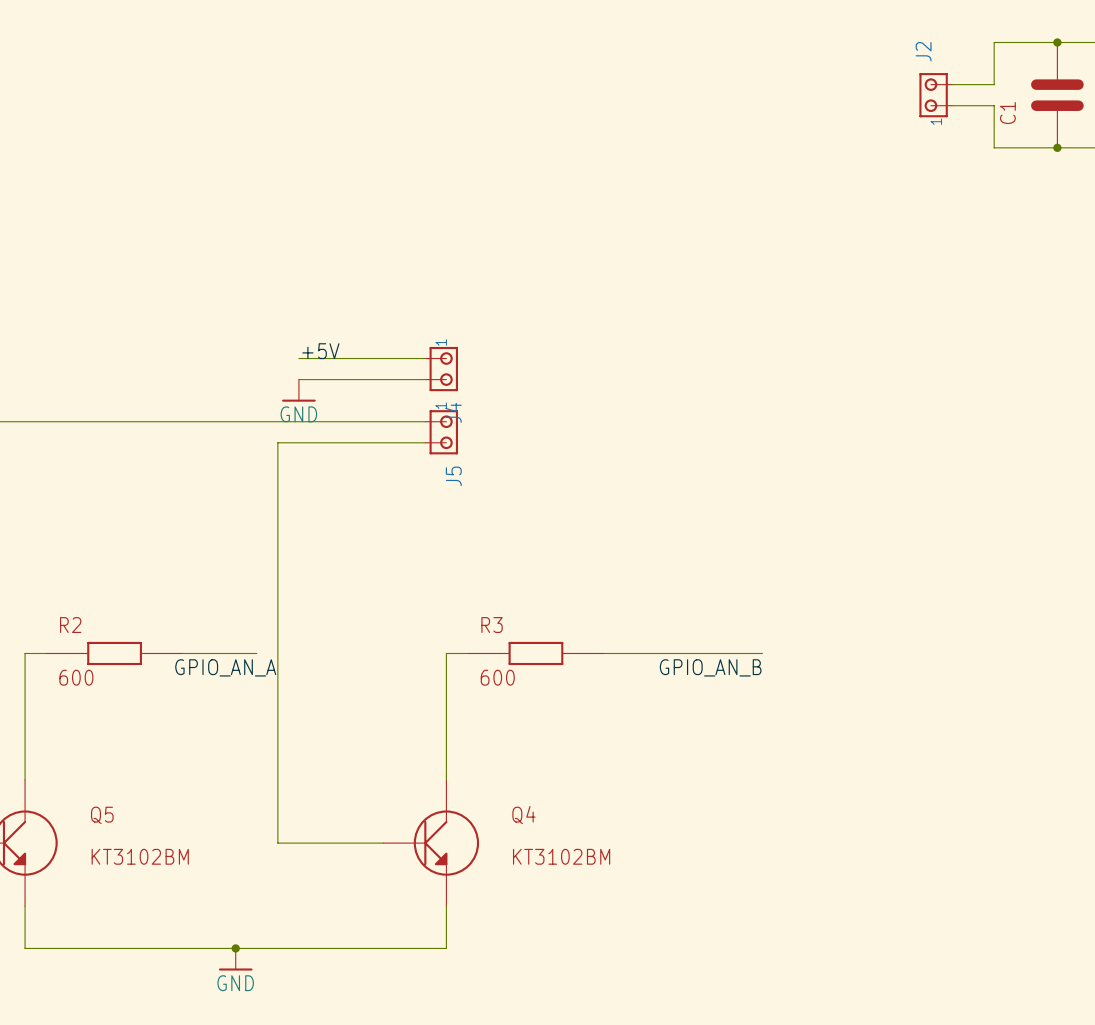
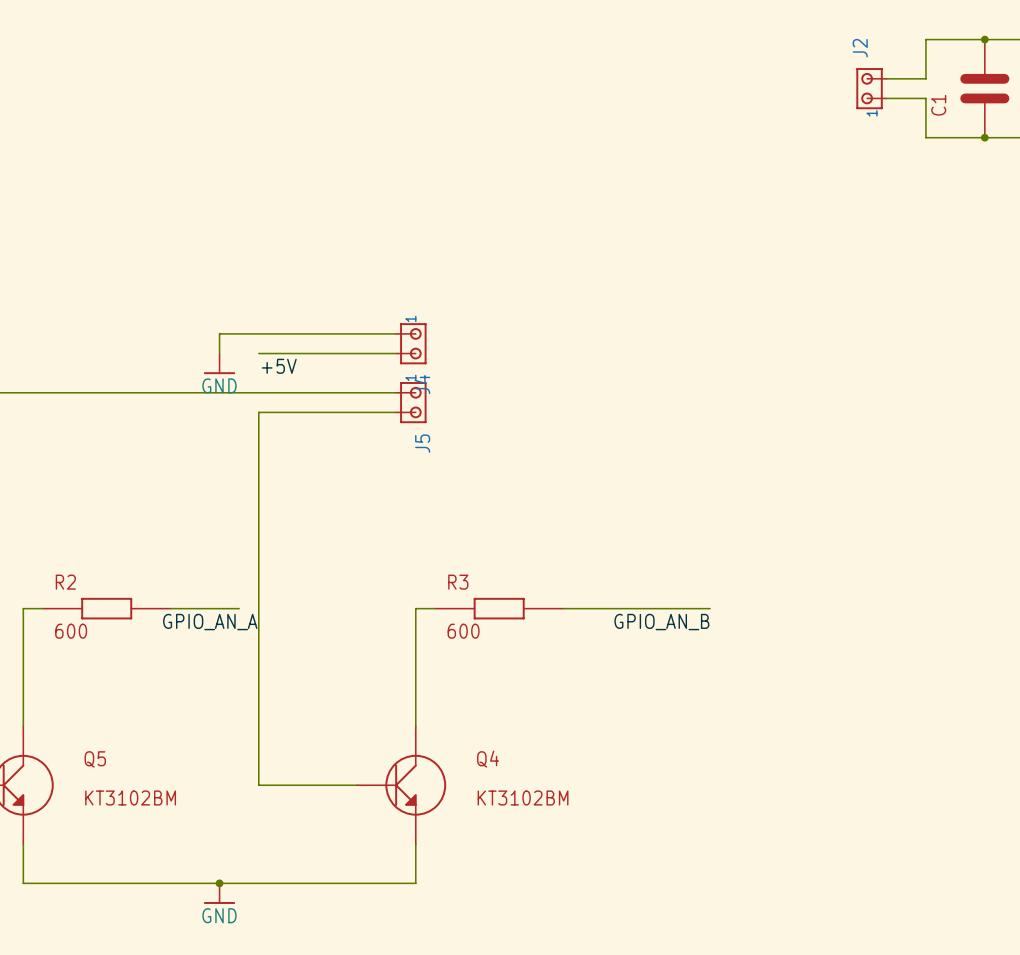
label position: +5V (320, 351) -> +5V (279, 366)
wire: none -> (278, 333) (219, 333) (219, 353)
wire: none -> (258, 353) (278, 353)
power symbol position: GND (298, 390) -> GND (219, 363)

